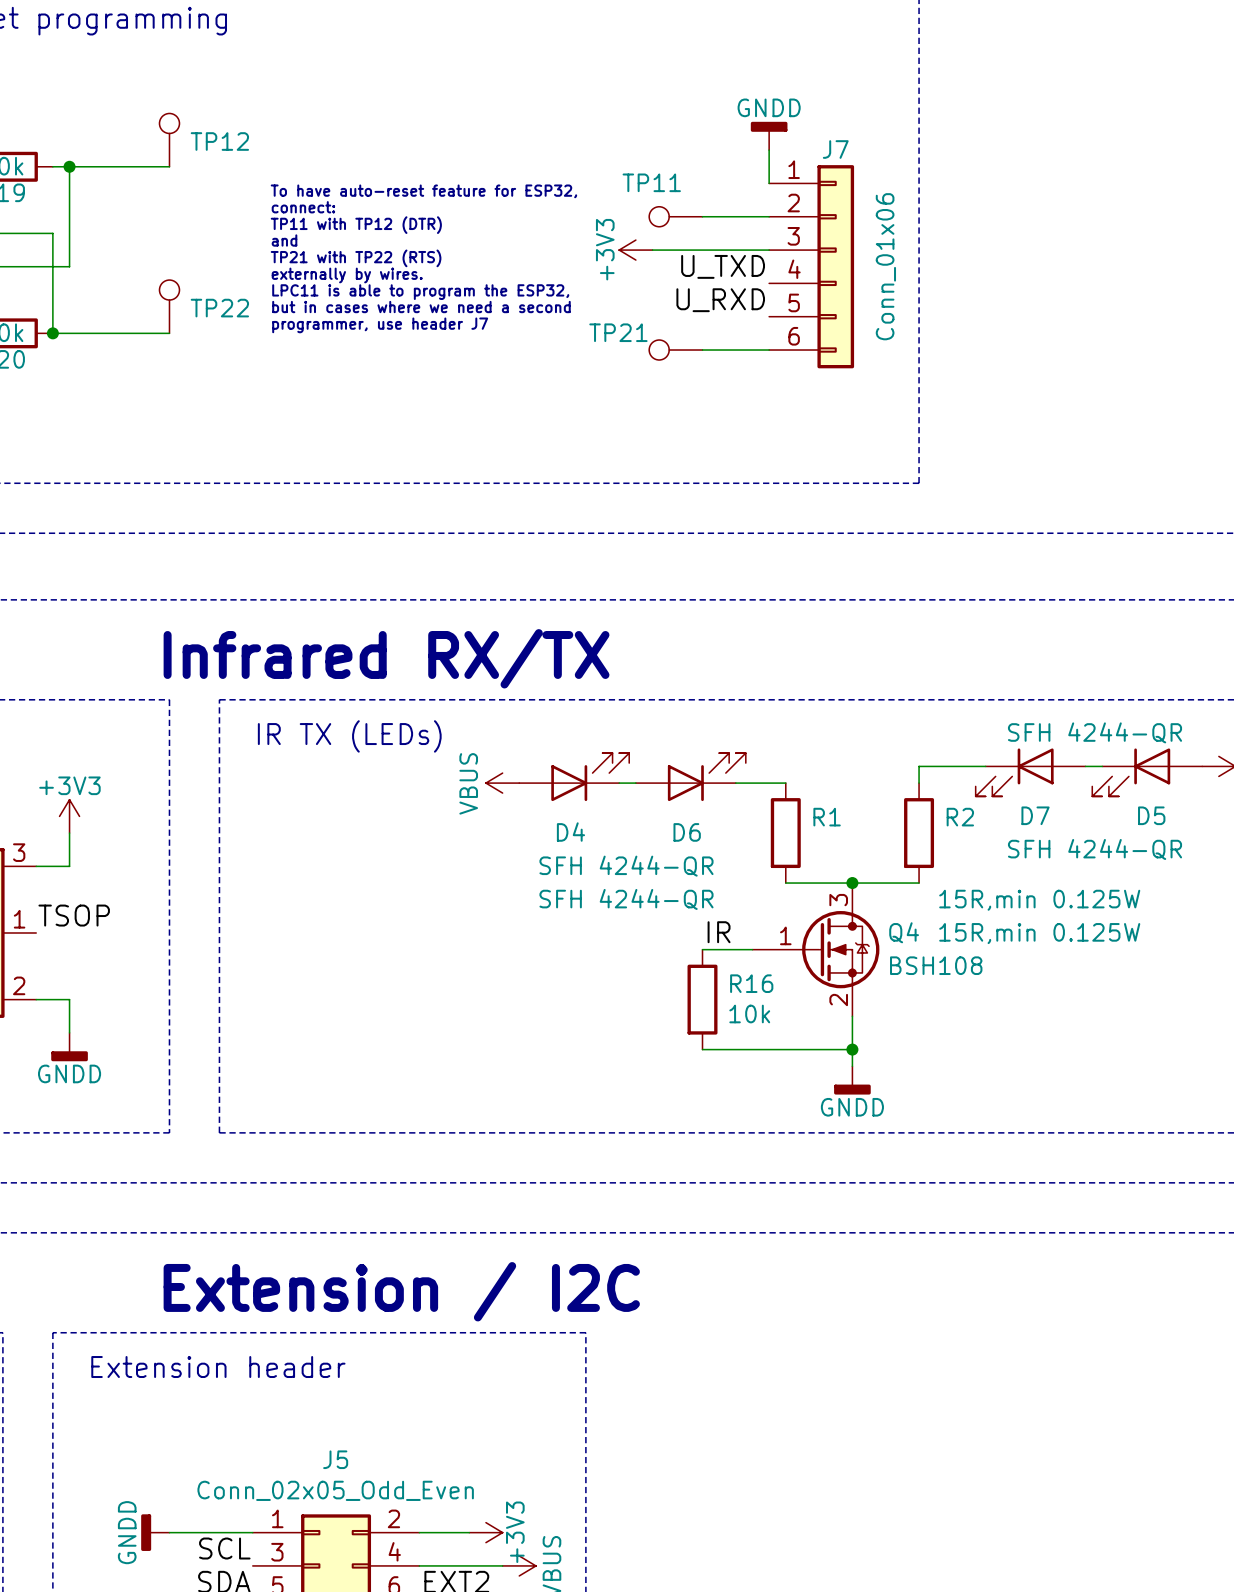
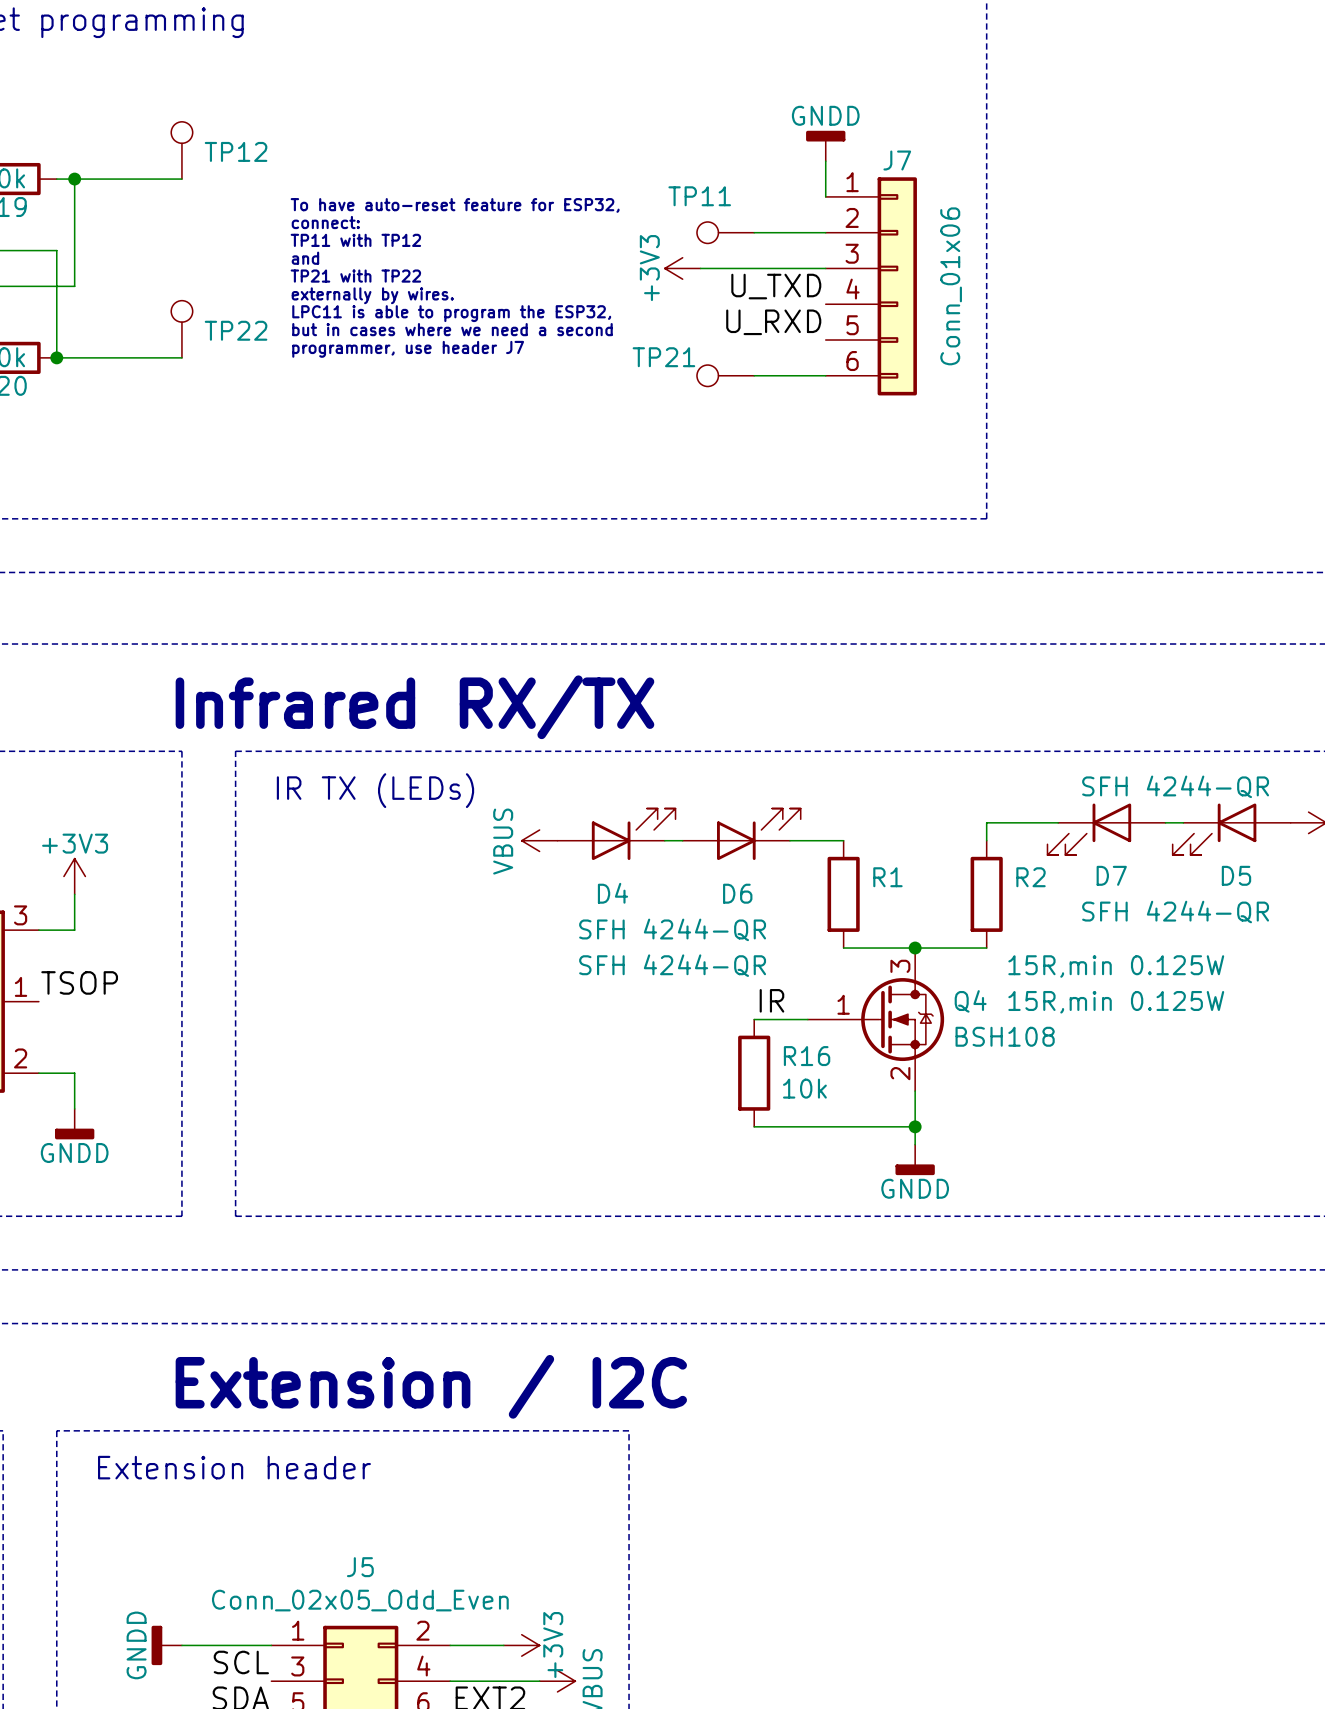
text: TP11 with TP12 (DTR) (356, 225) -> TP11 with TP12 (355, 240)
text: TP21 with TP22 (RTS) (356, 258) -> TP21 with TP22 (355, 276)

